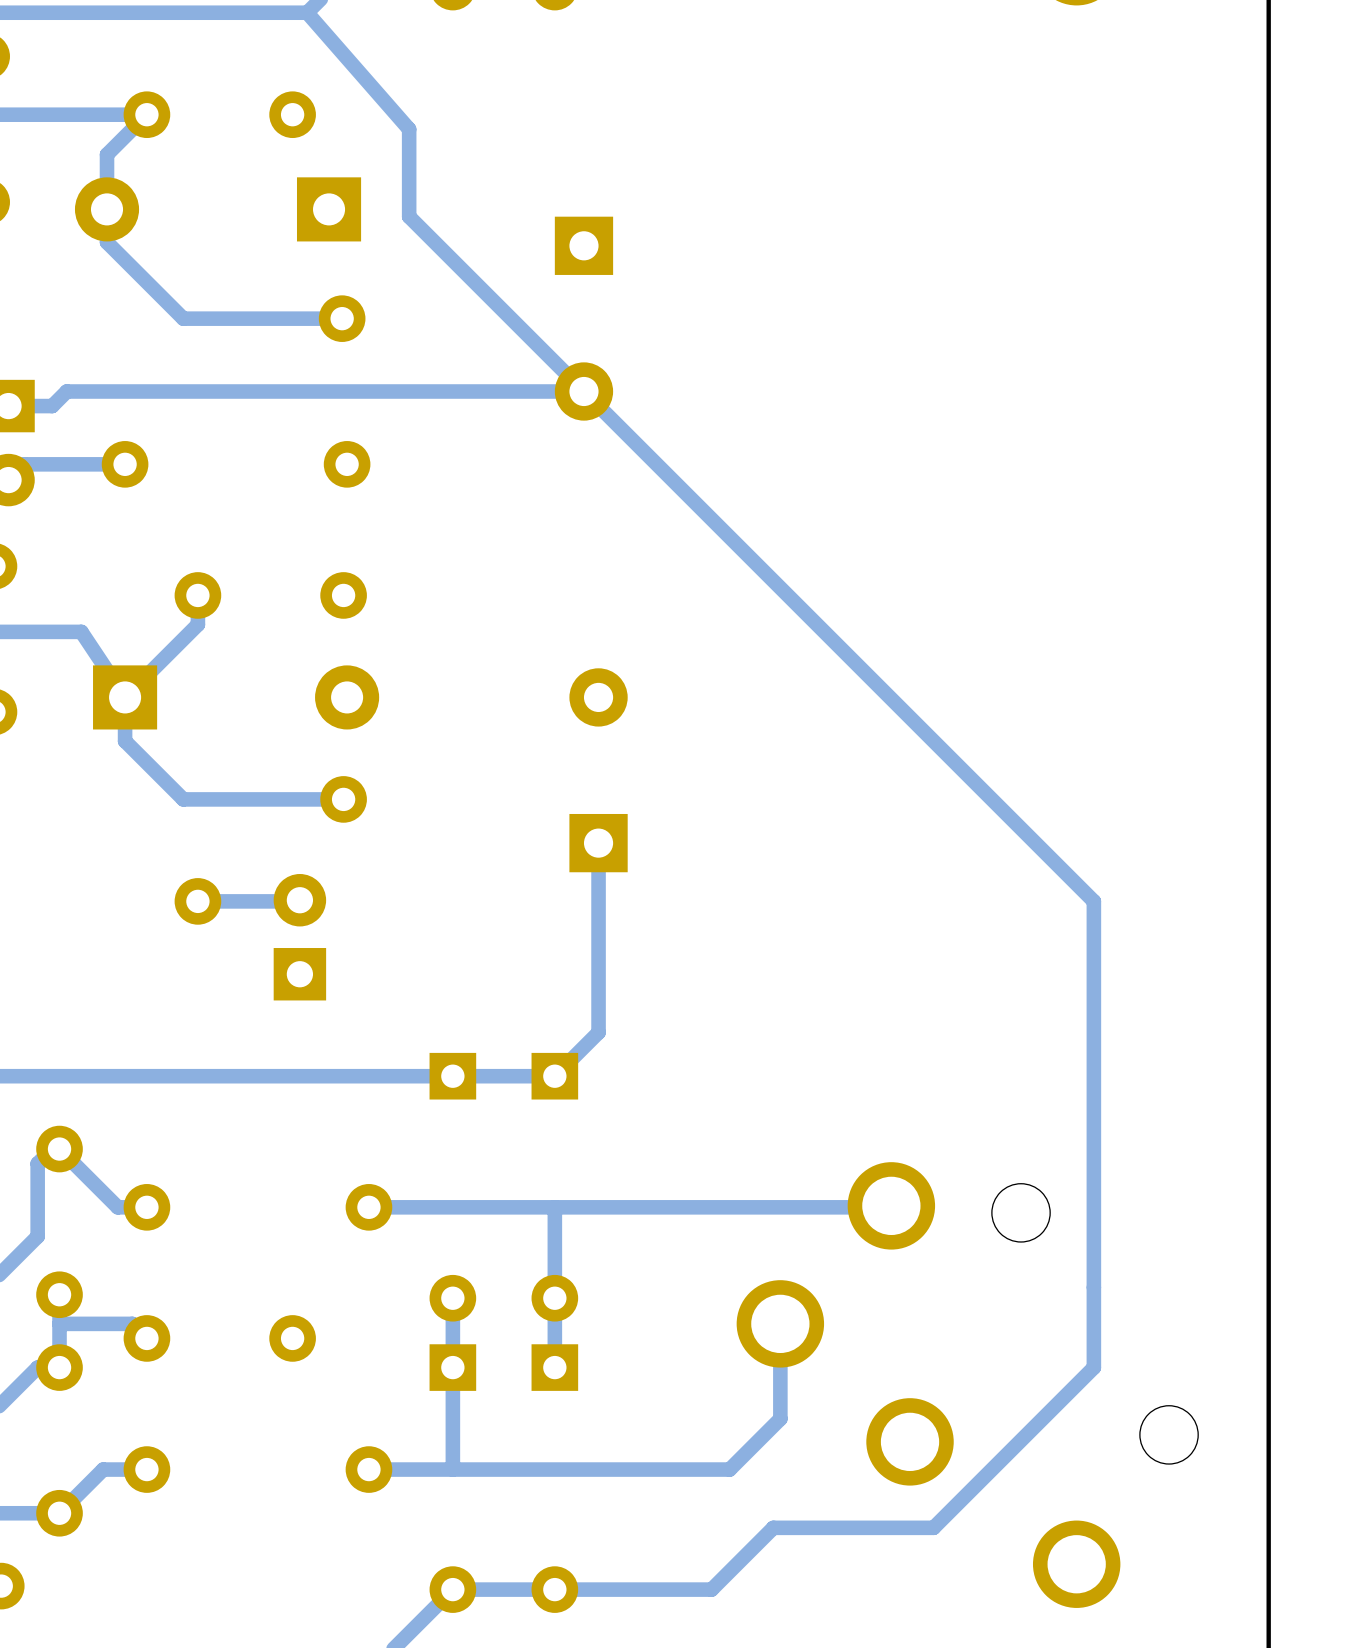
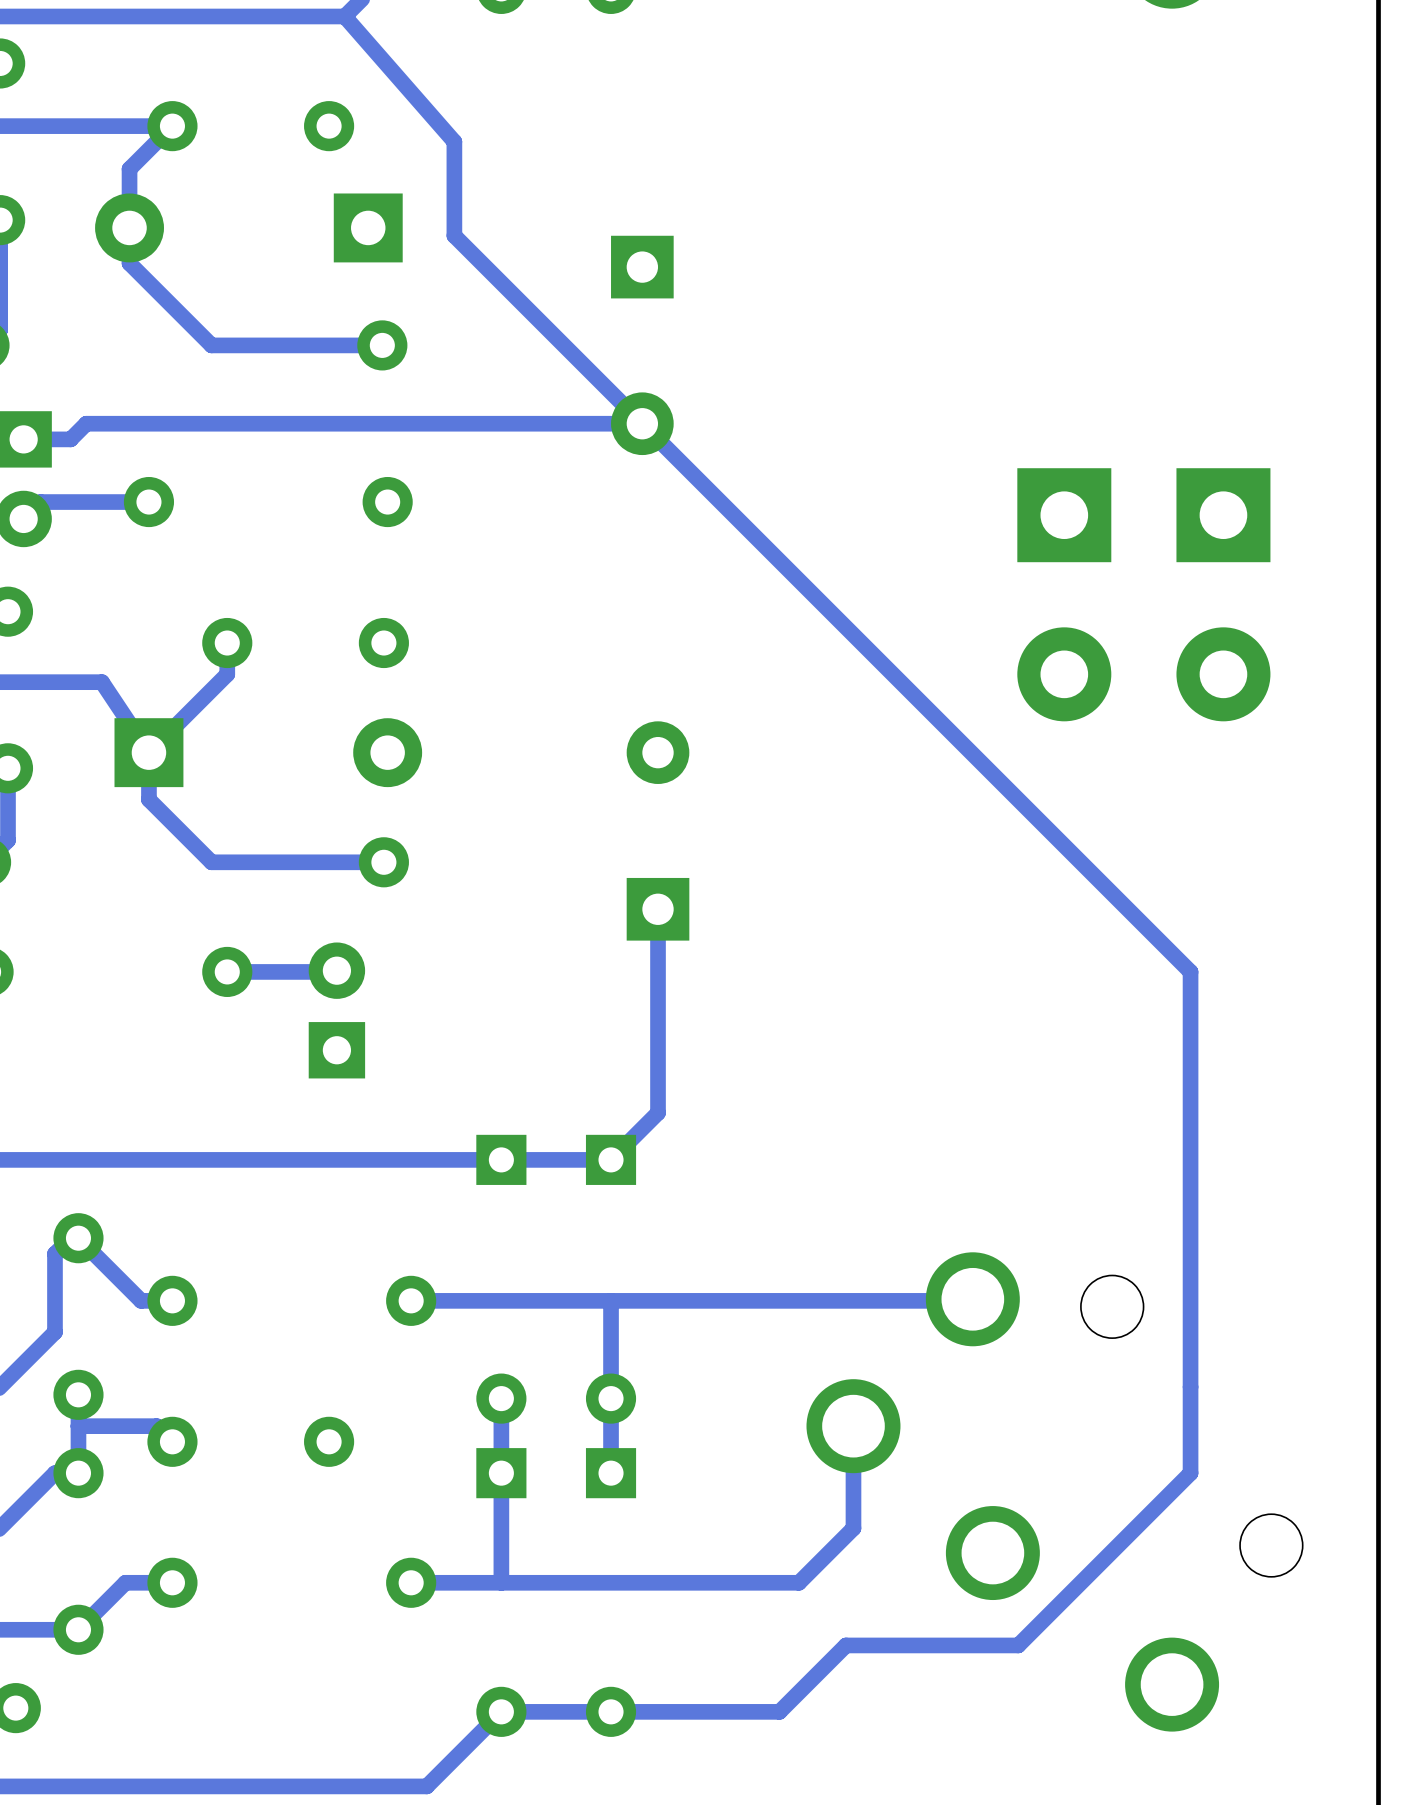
part: none -> (1143, 594)

